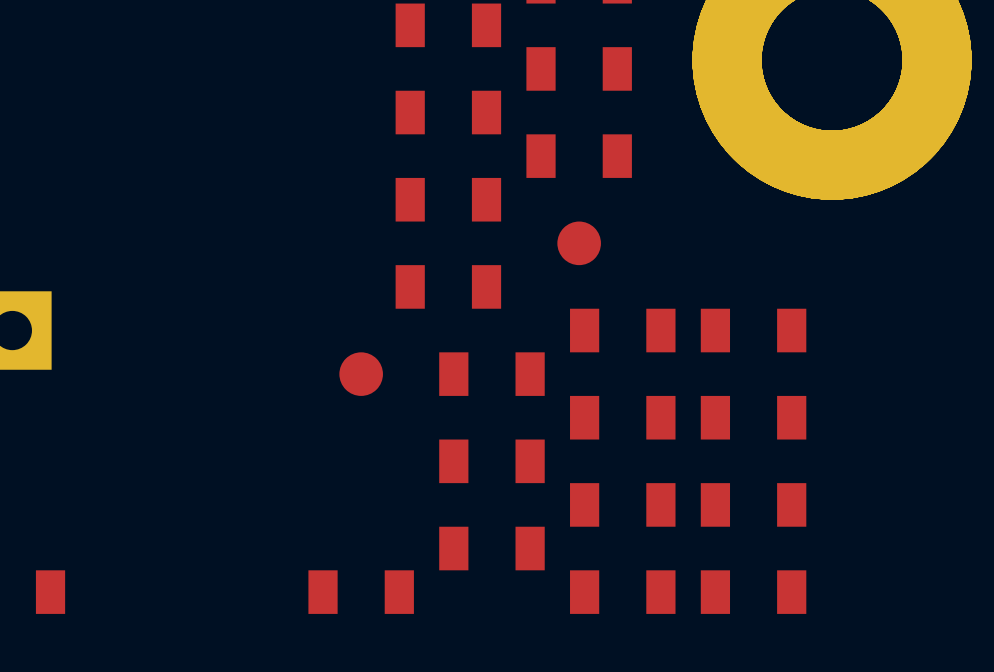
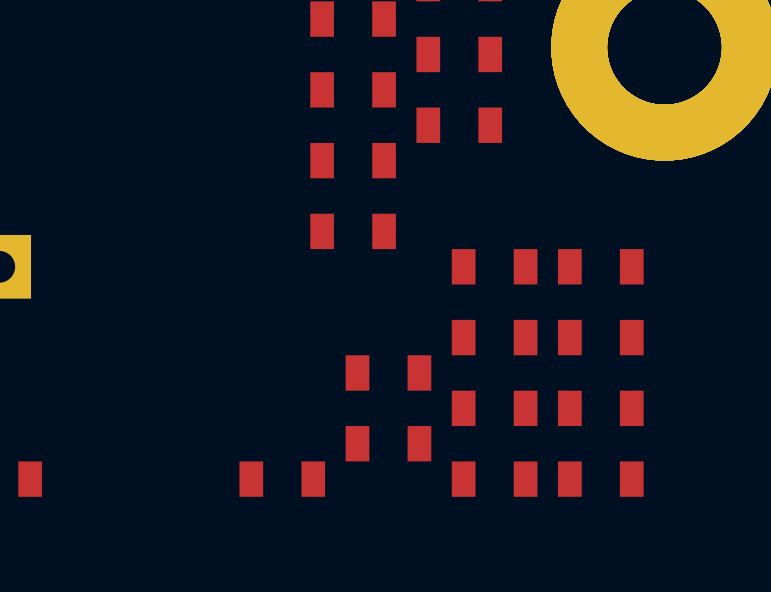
part: (579, 243) -> none
part: (361, 374) -> none
part: (491, 374) -> none

